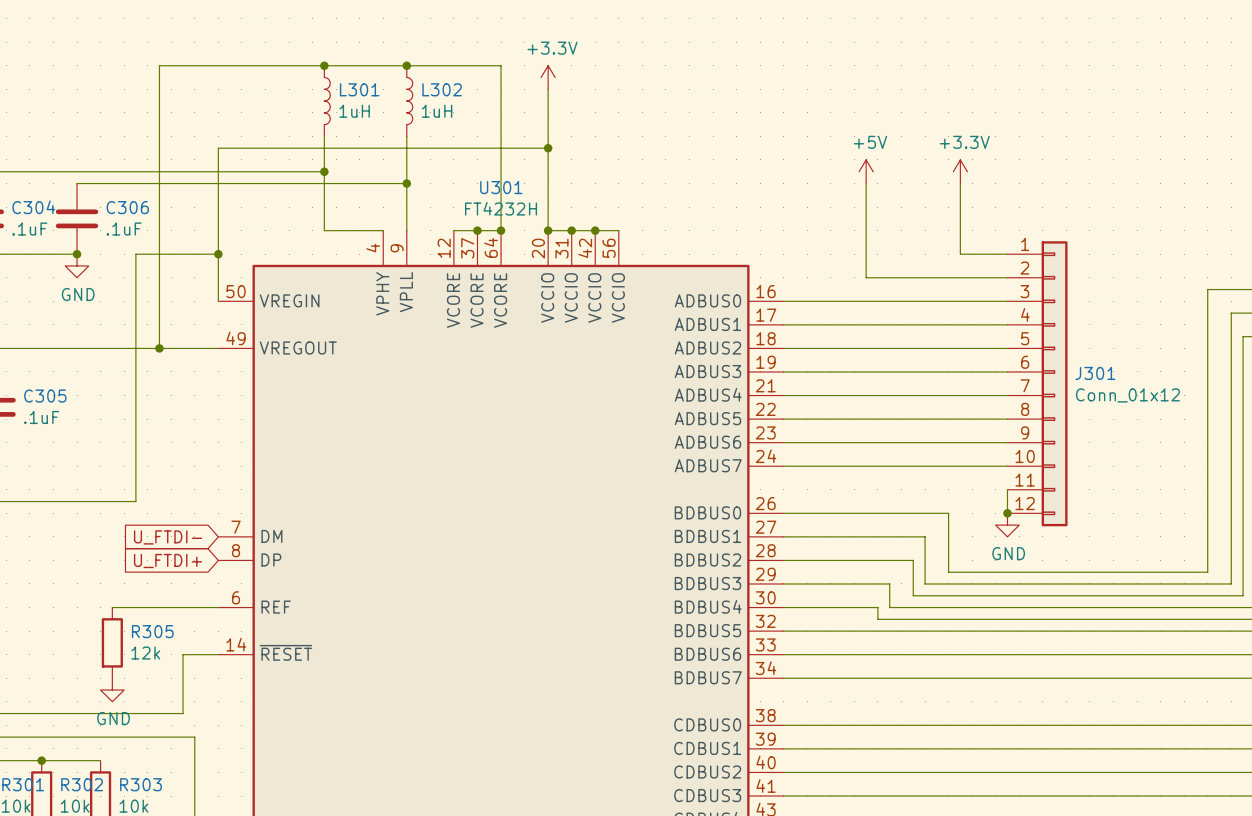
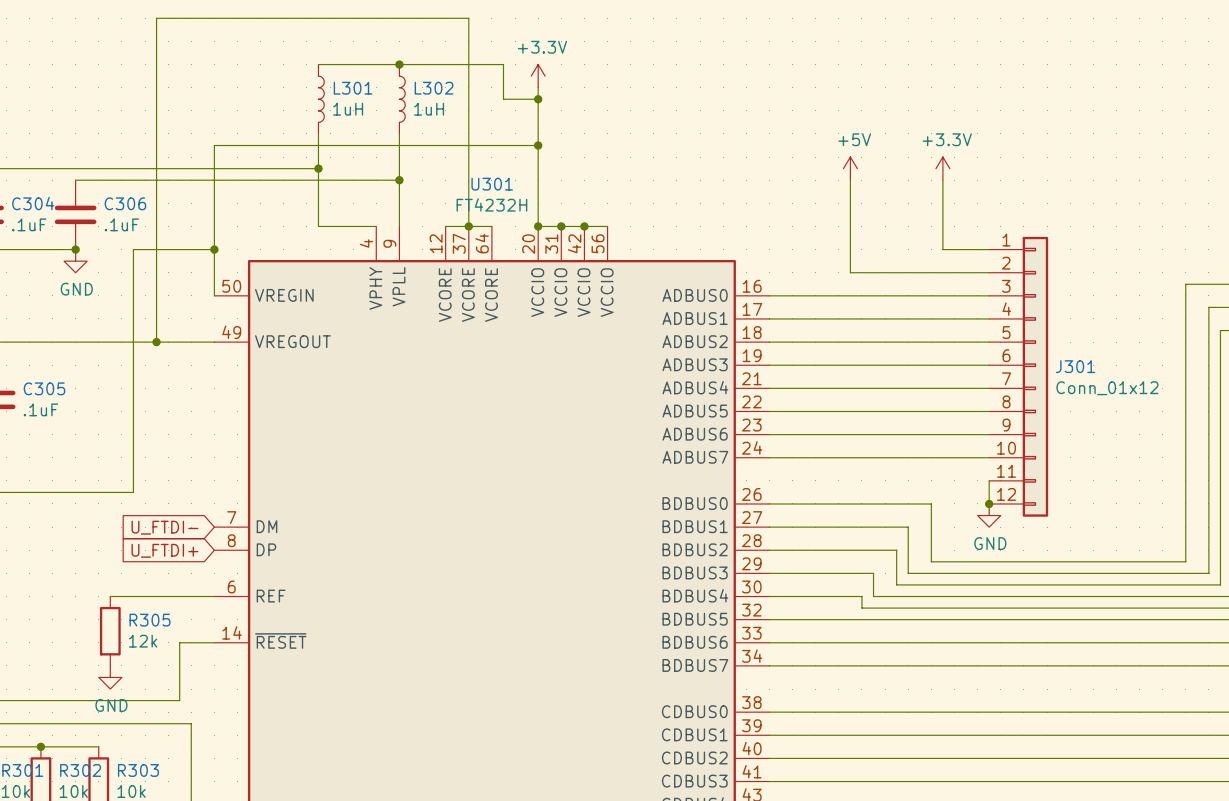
wire: (159, 65) (324, 65) -> (156, 64) (156, 18) (468, 18) (468, 226)
junction: (324, 65) -> none
wire: (501, 65) (501, 230) -> (491, 64) (503, 64) (503, 99) (538, 99)
junction: none -> (538, 99)
junction: (501, 230) -> none

